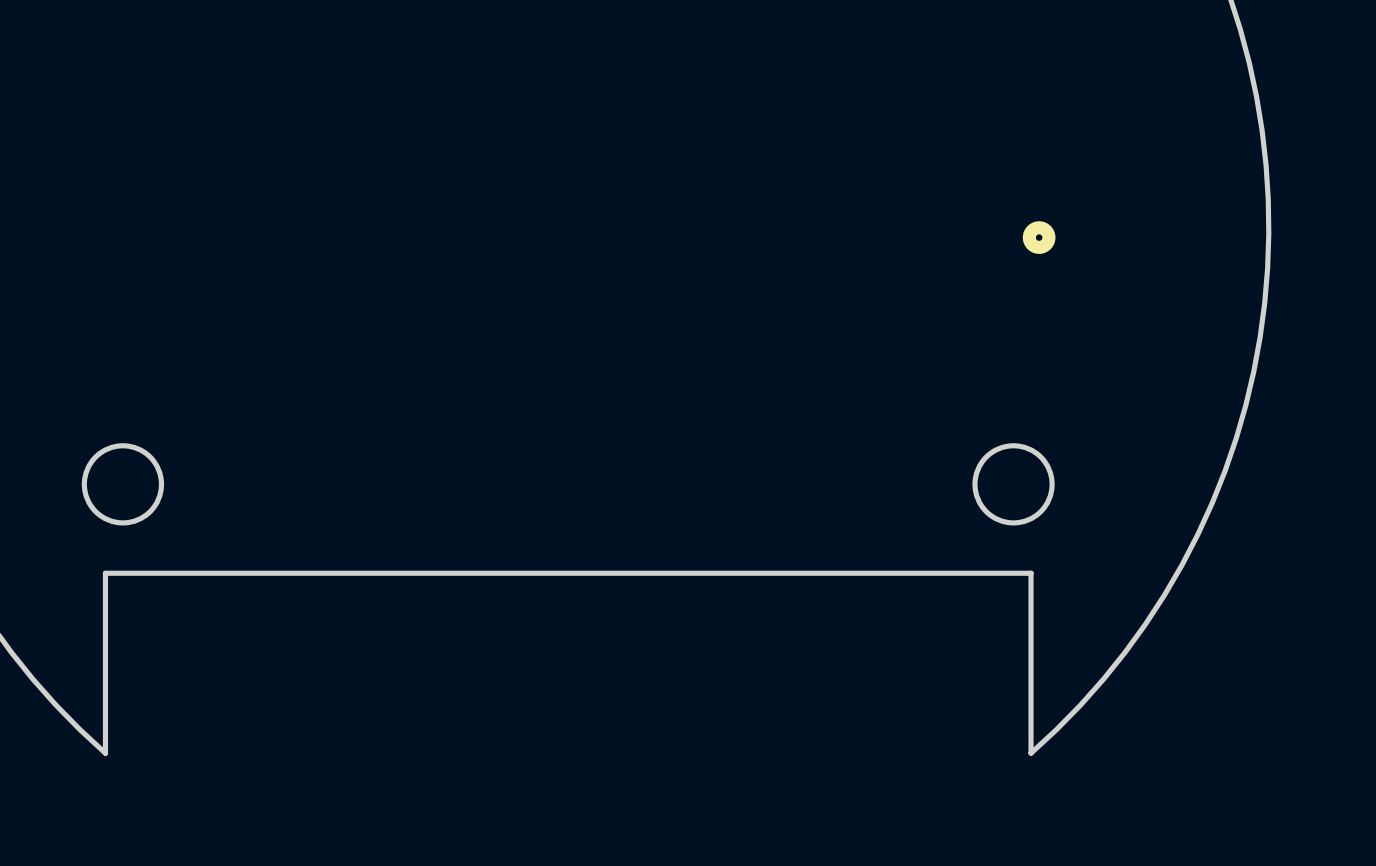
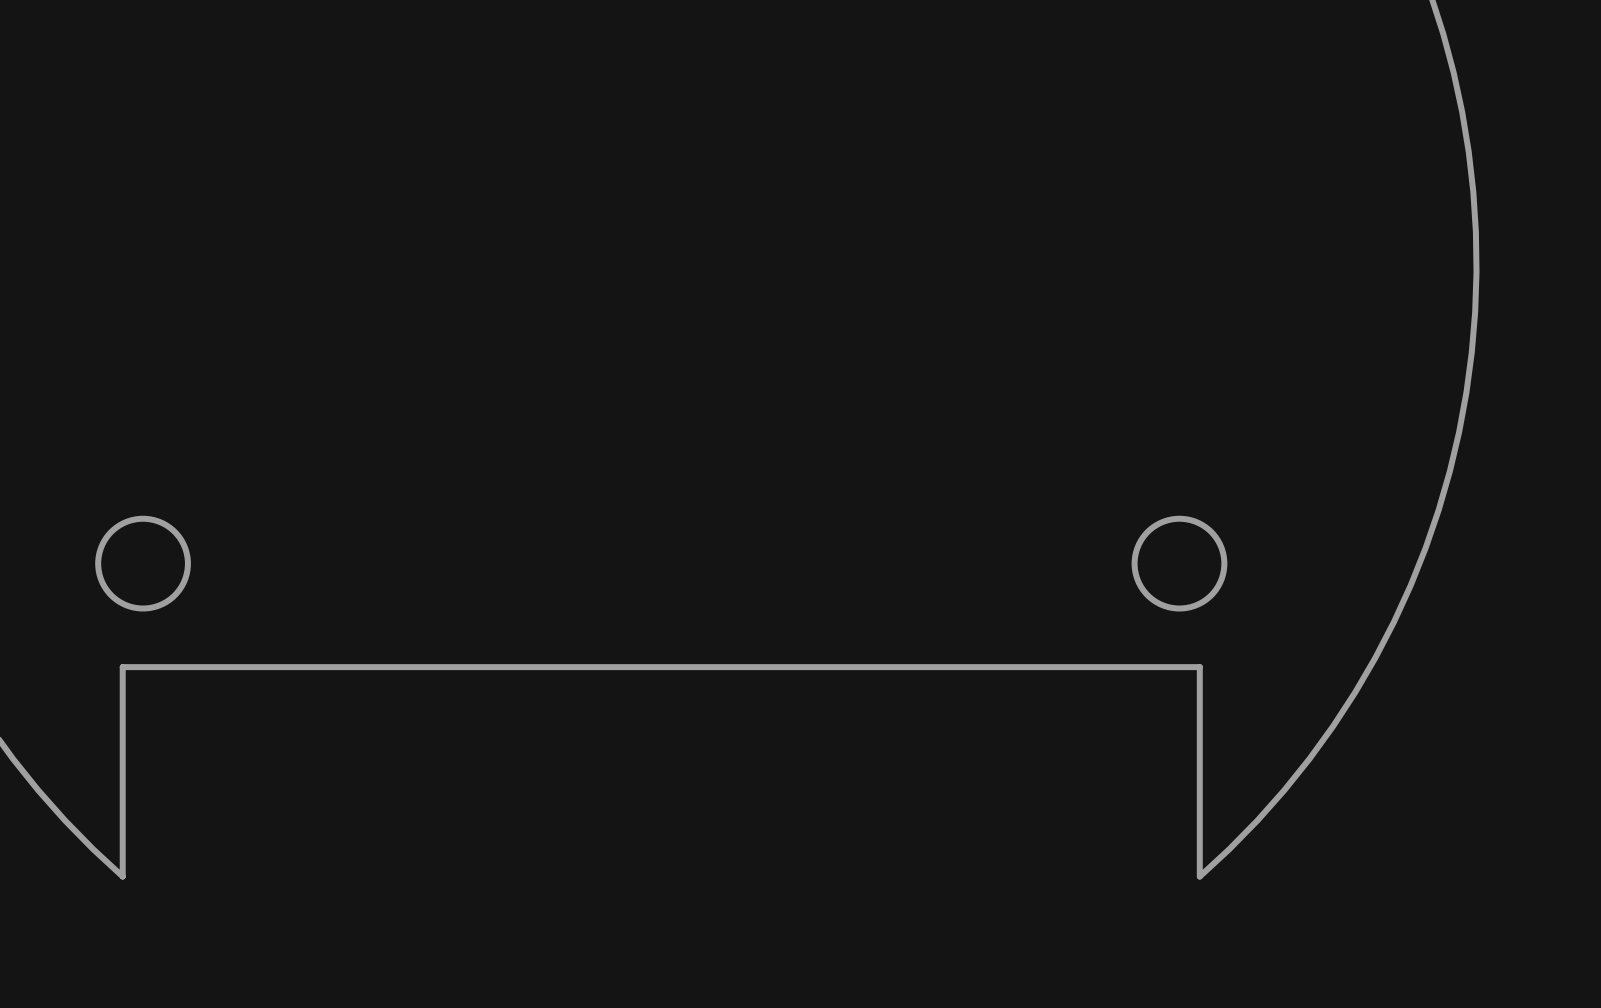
part: (1039, 237) -> none

